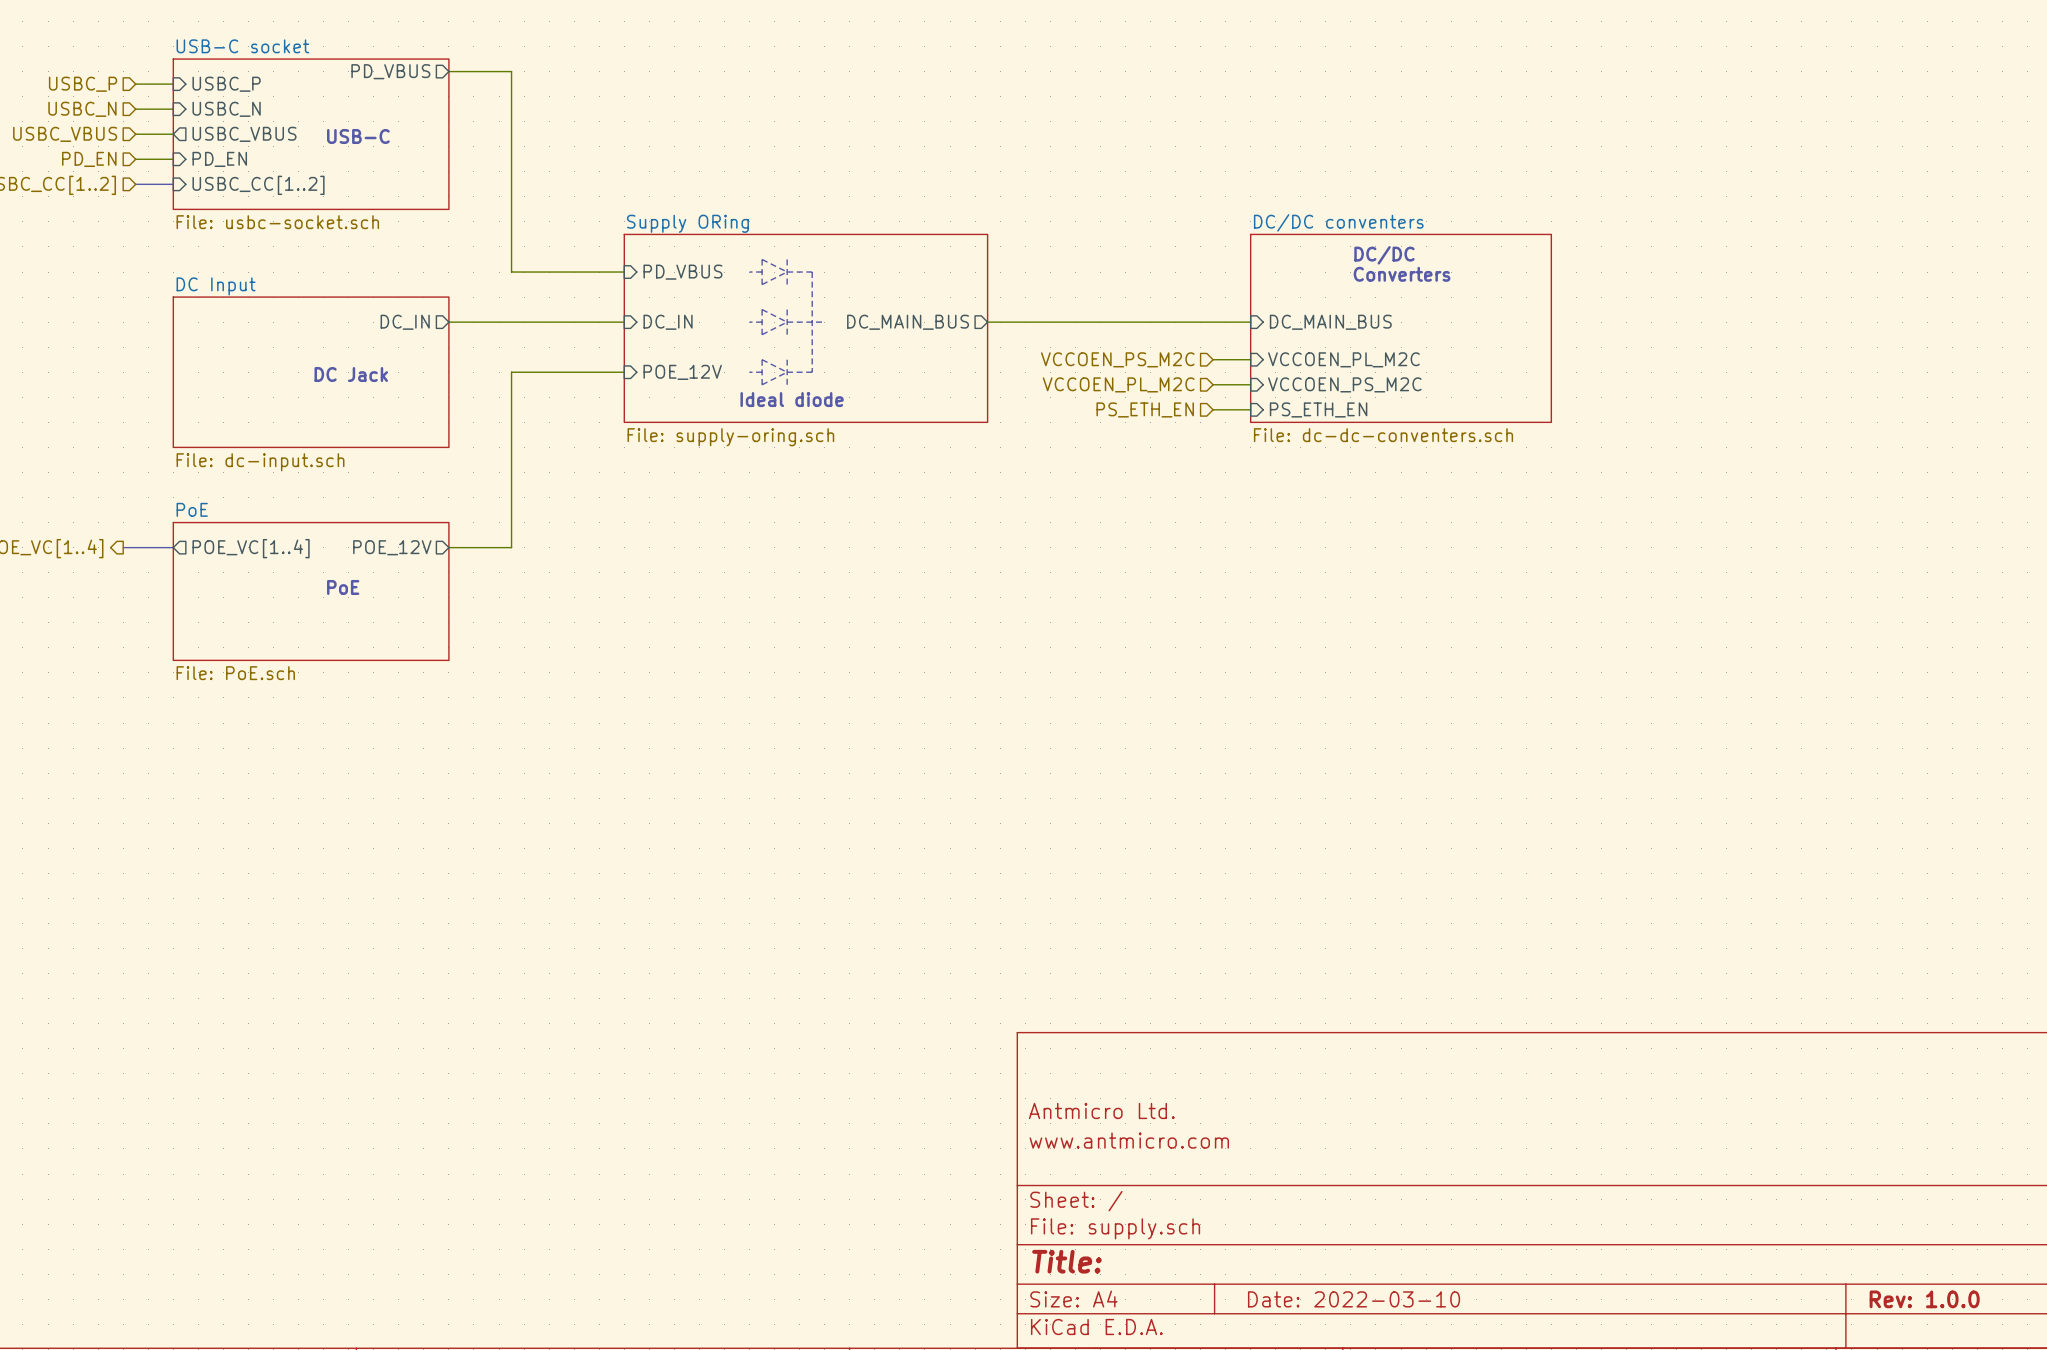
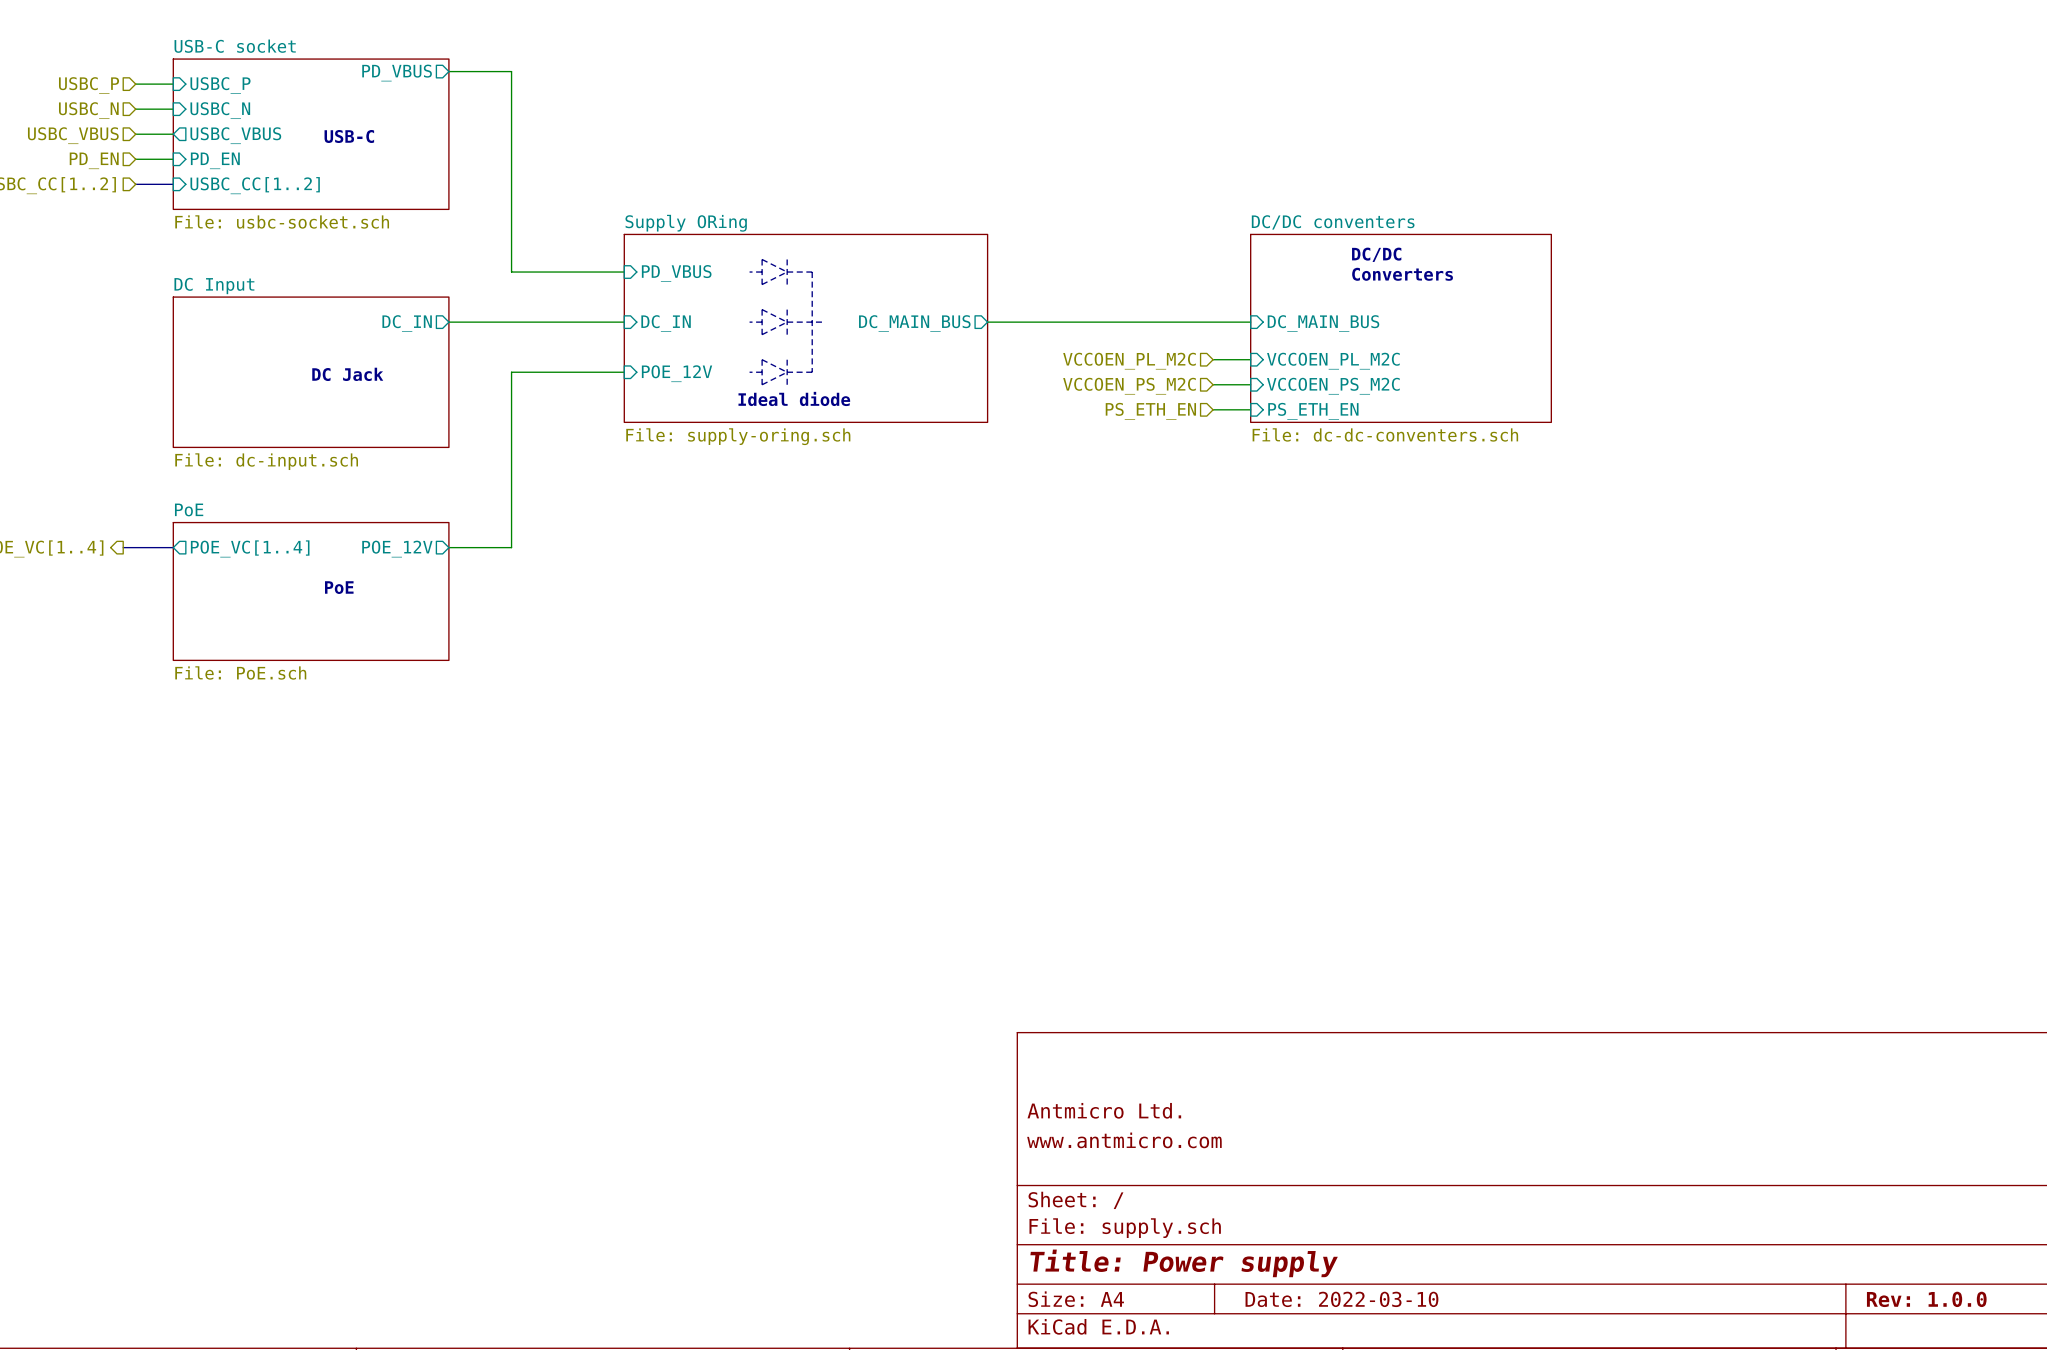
hierarchical label: VCCOEN_PS_M2C (1117, 359) -> VCCOEN_PL_M2C (1129, 361)
hierarchical label: VCCOEN_PL_M2C (1118, 384) -> VCCOEN_PS_M2C (1129, 386)
title block: Title: (1066, 1261) -> Title: Power supply (1184, 1263)

